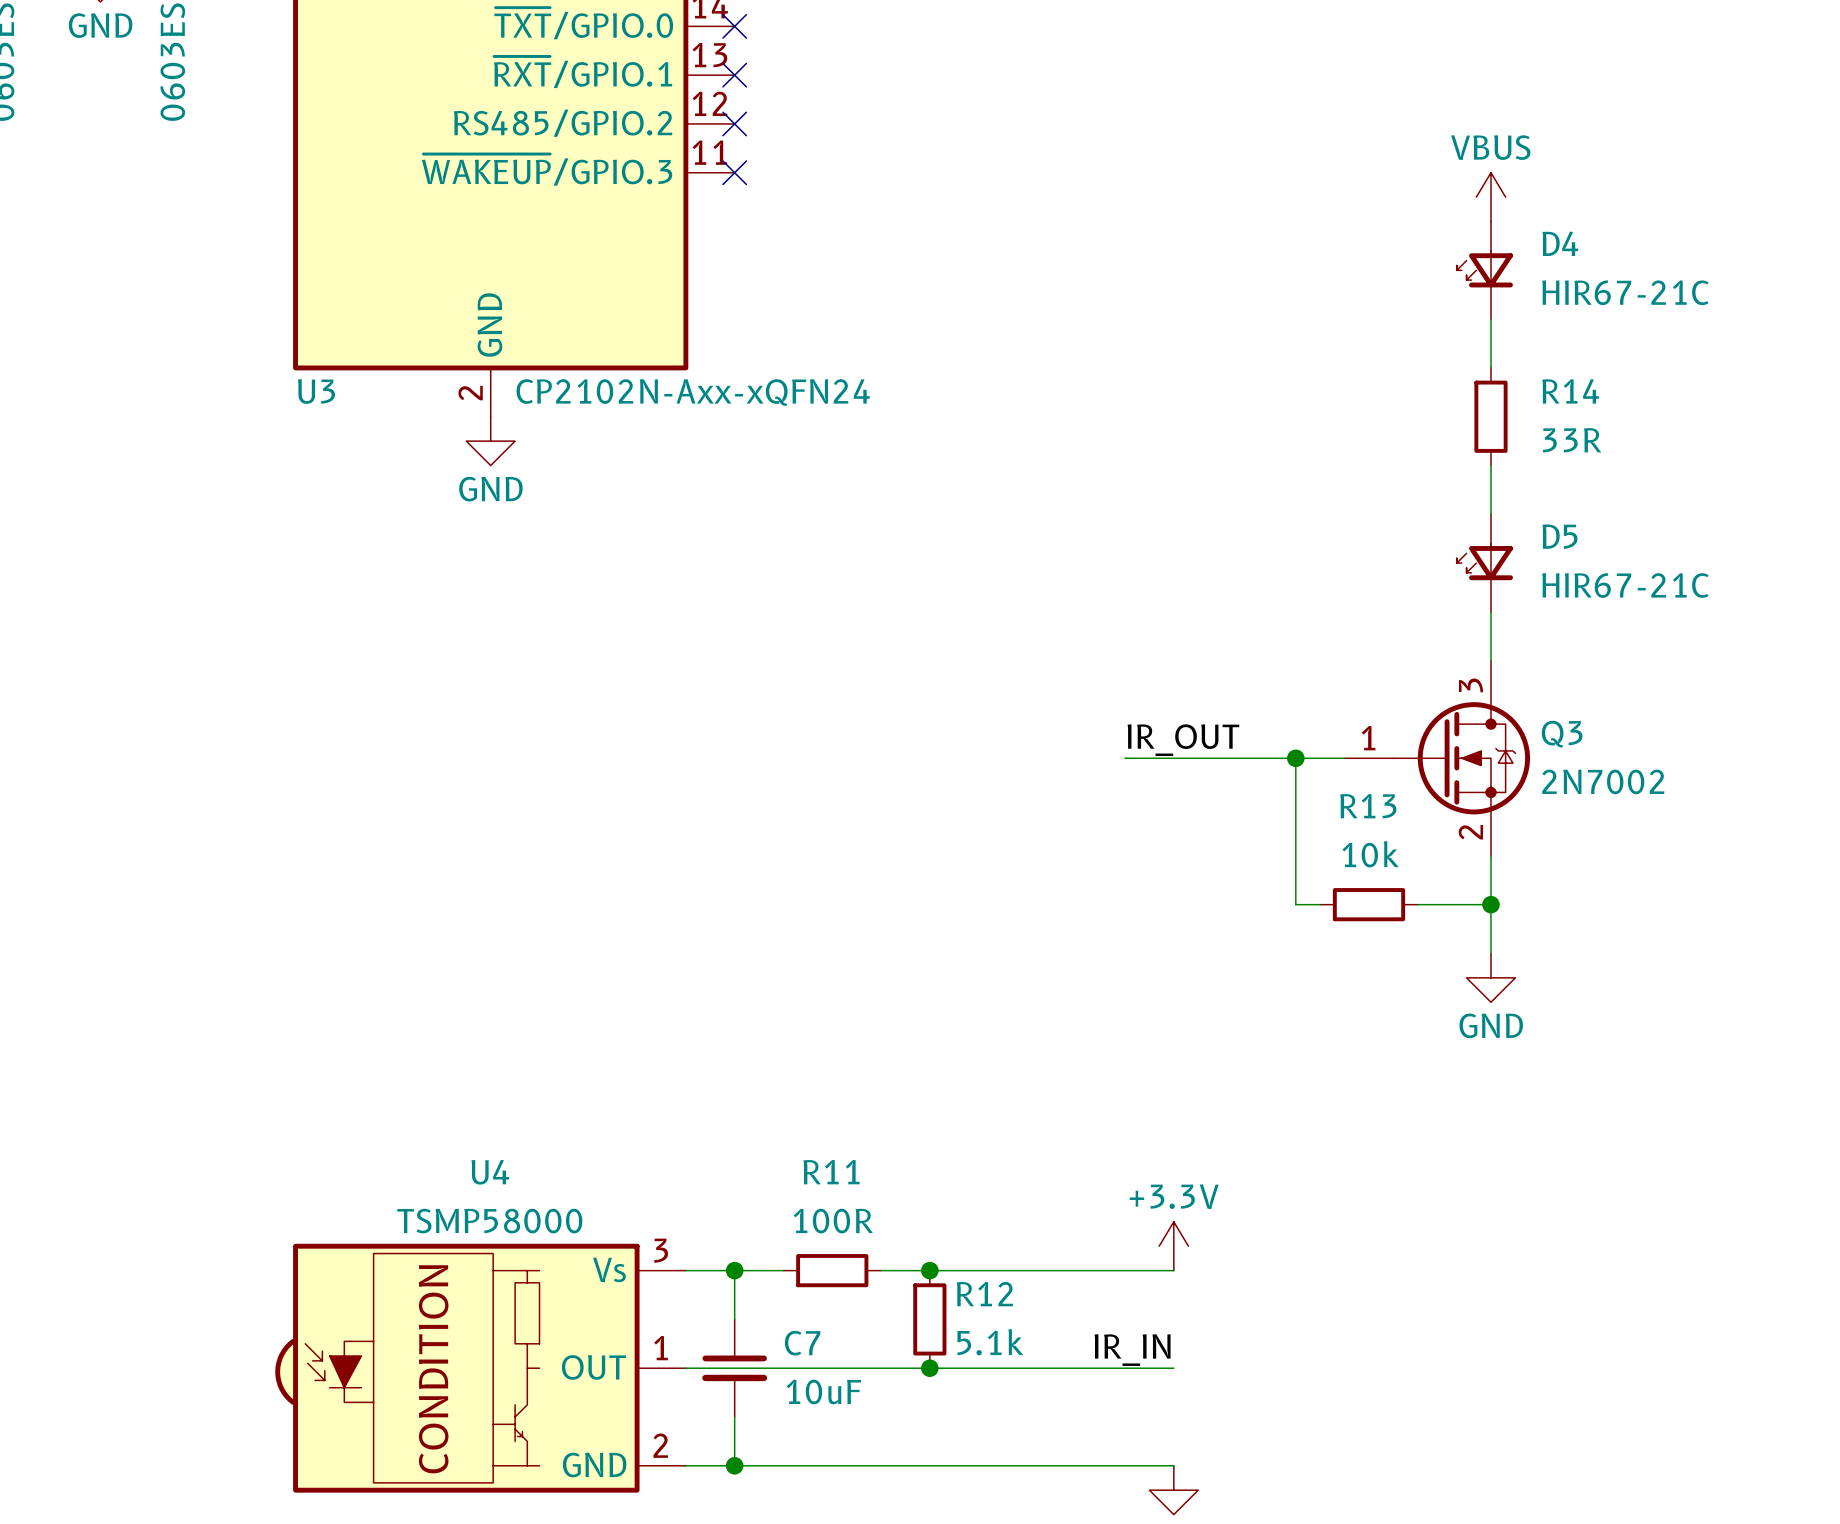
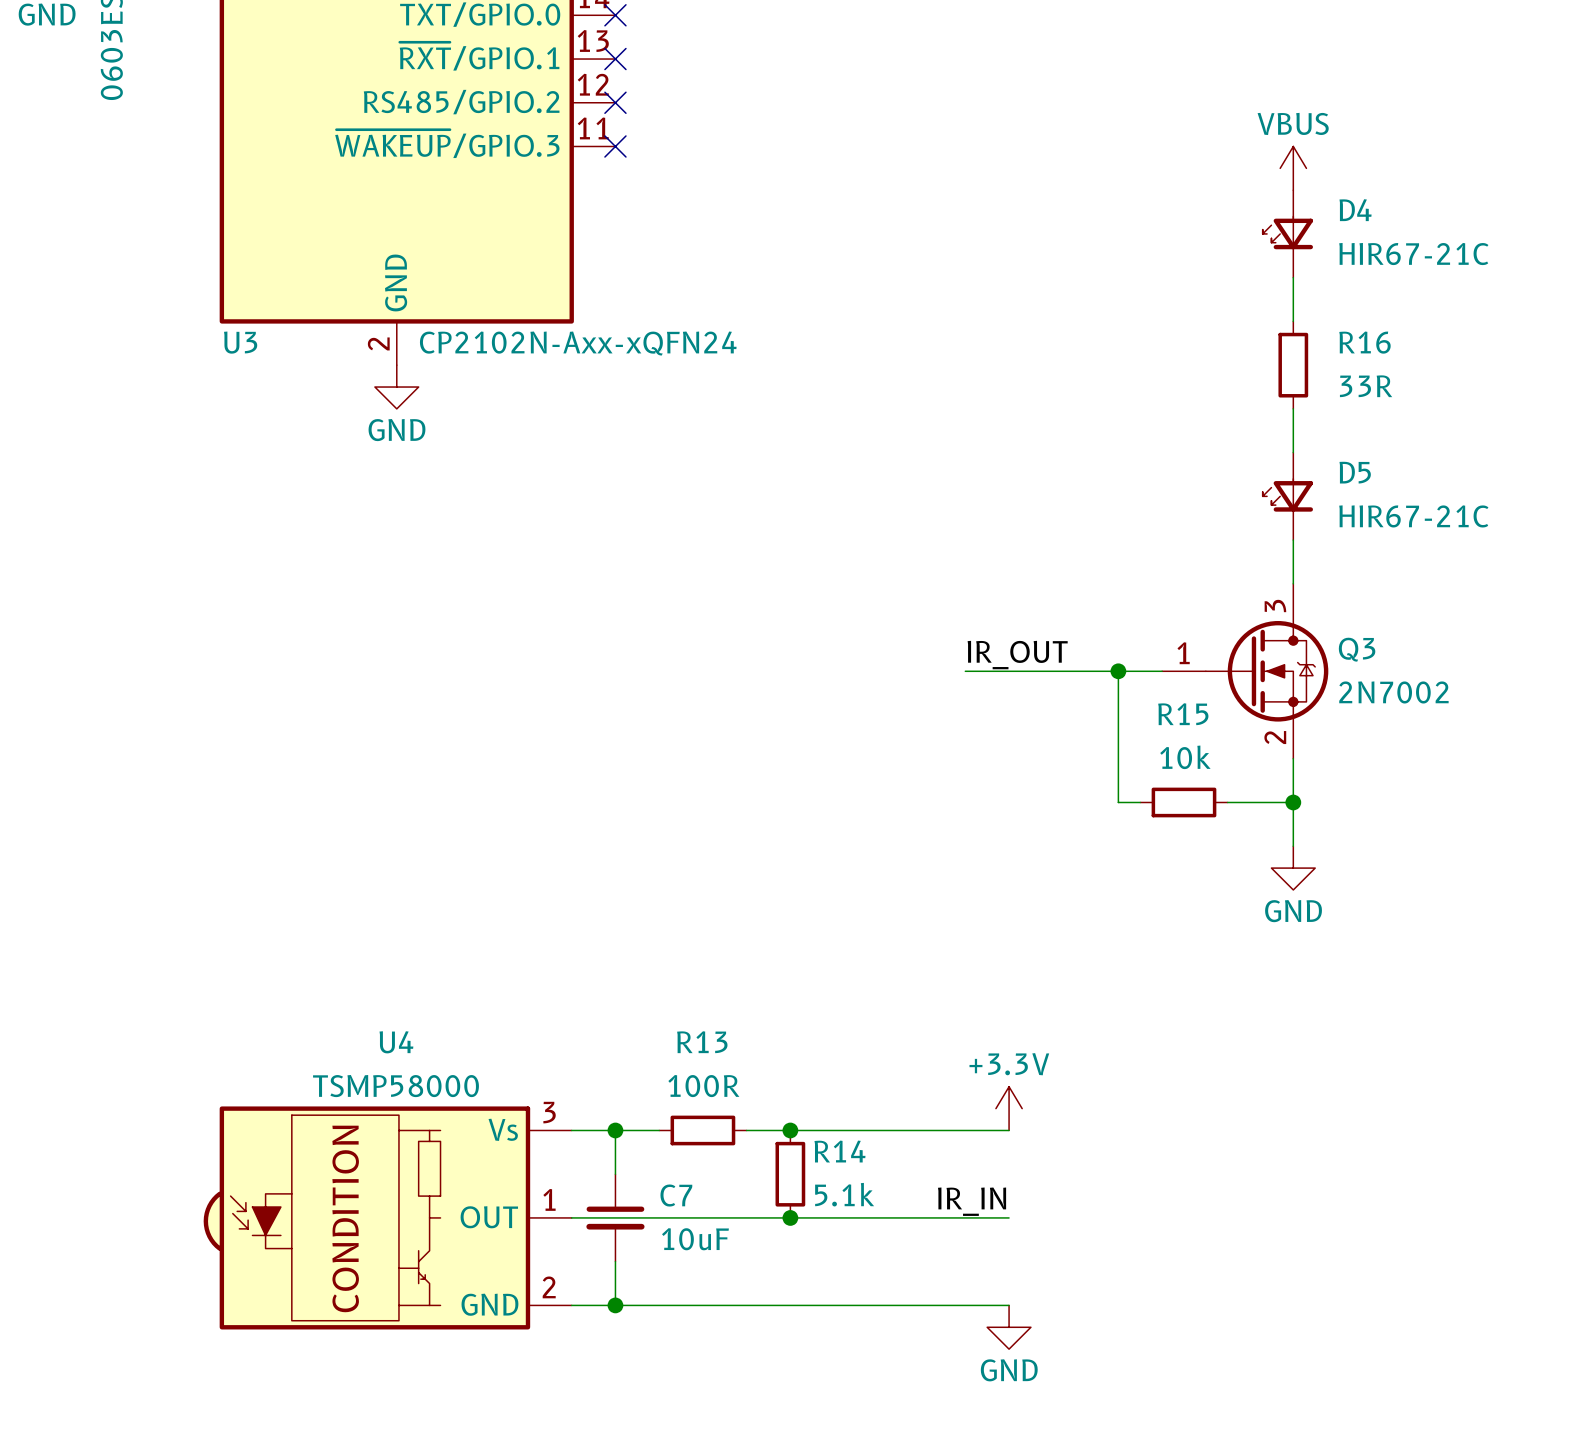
R14 name: R14 (1570, 391) -> R16 (1364, 342)
R13 name: R13 (1368, 806) -> R15 (1183, 714)
R11 name: R11 (831, 1172) -> R13 (702, 1042)
R12 name: R12 (984, 1294) -> R14 (839, 1151)

